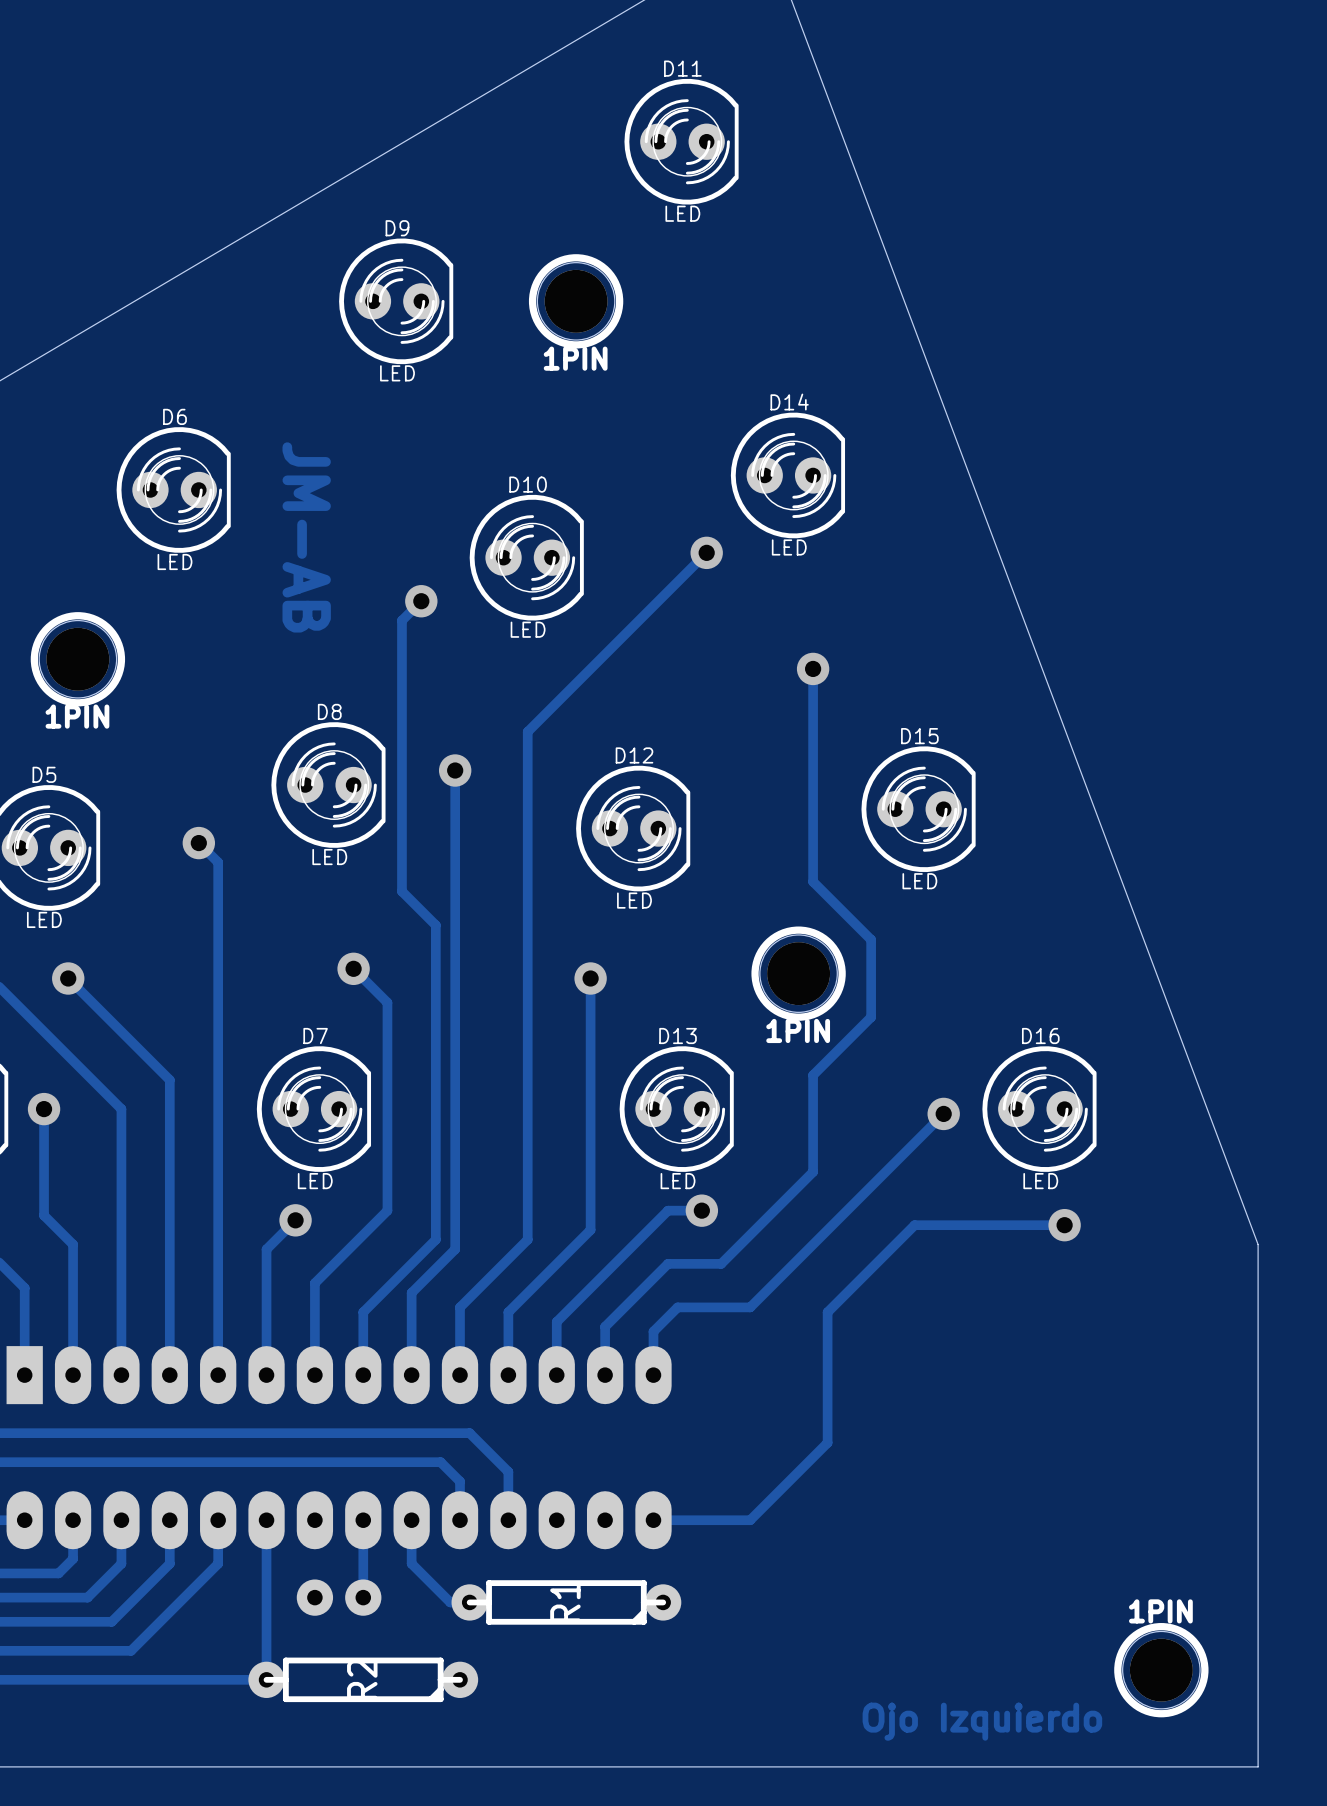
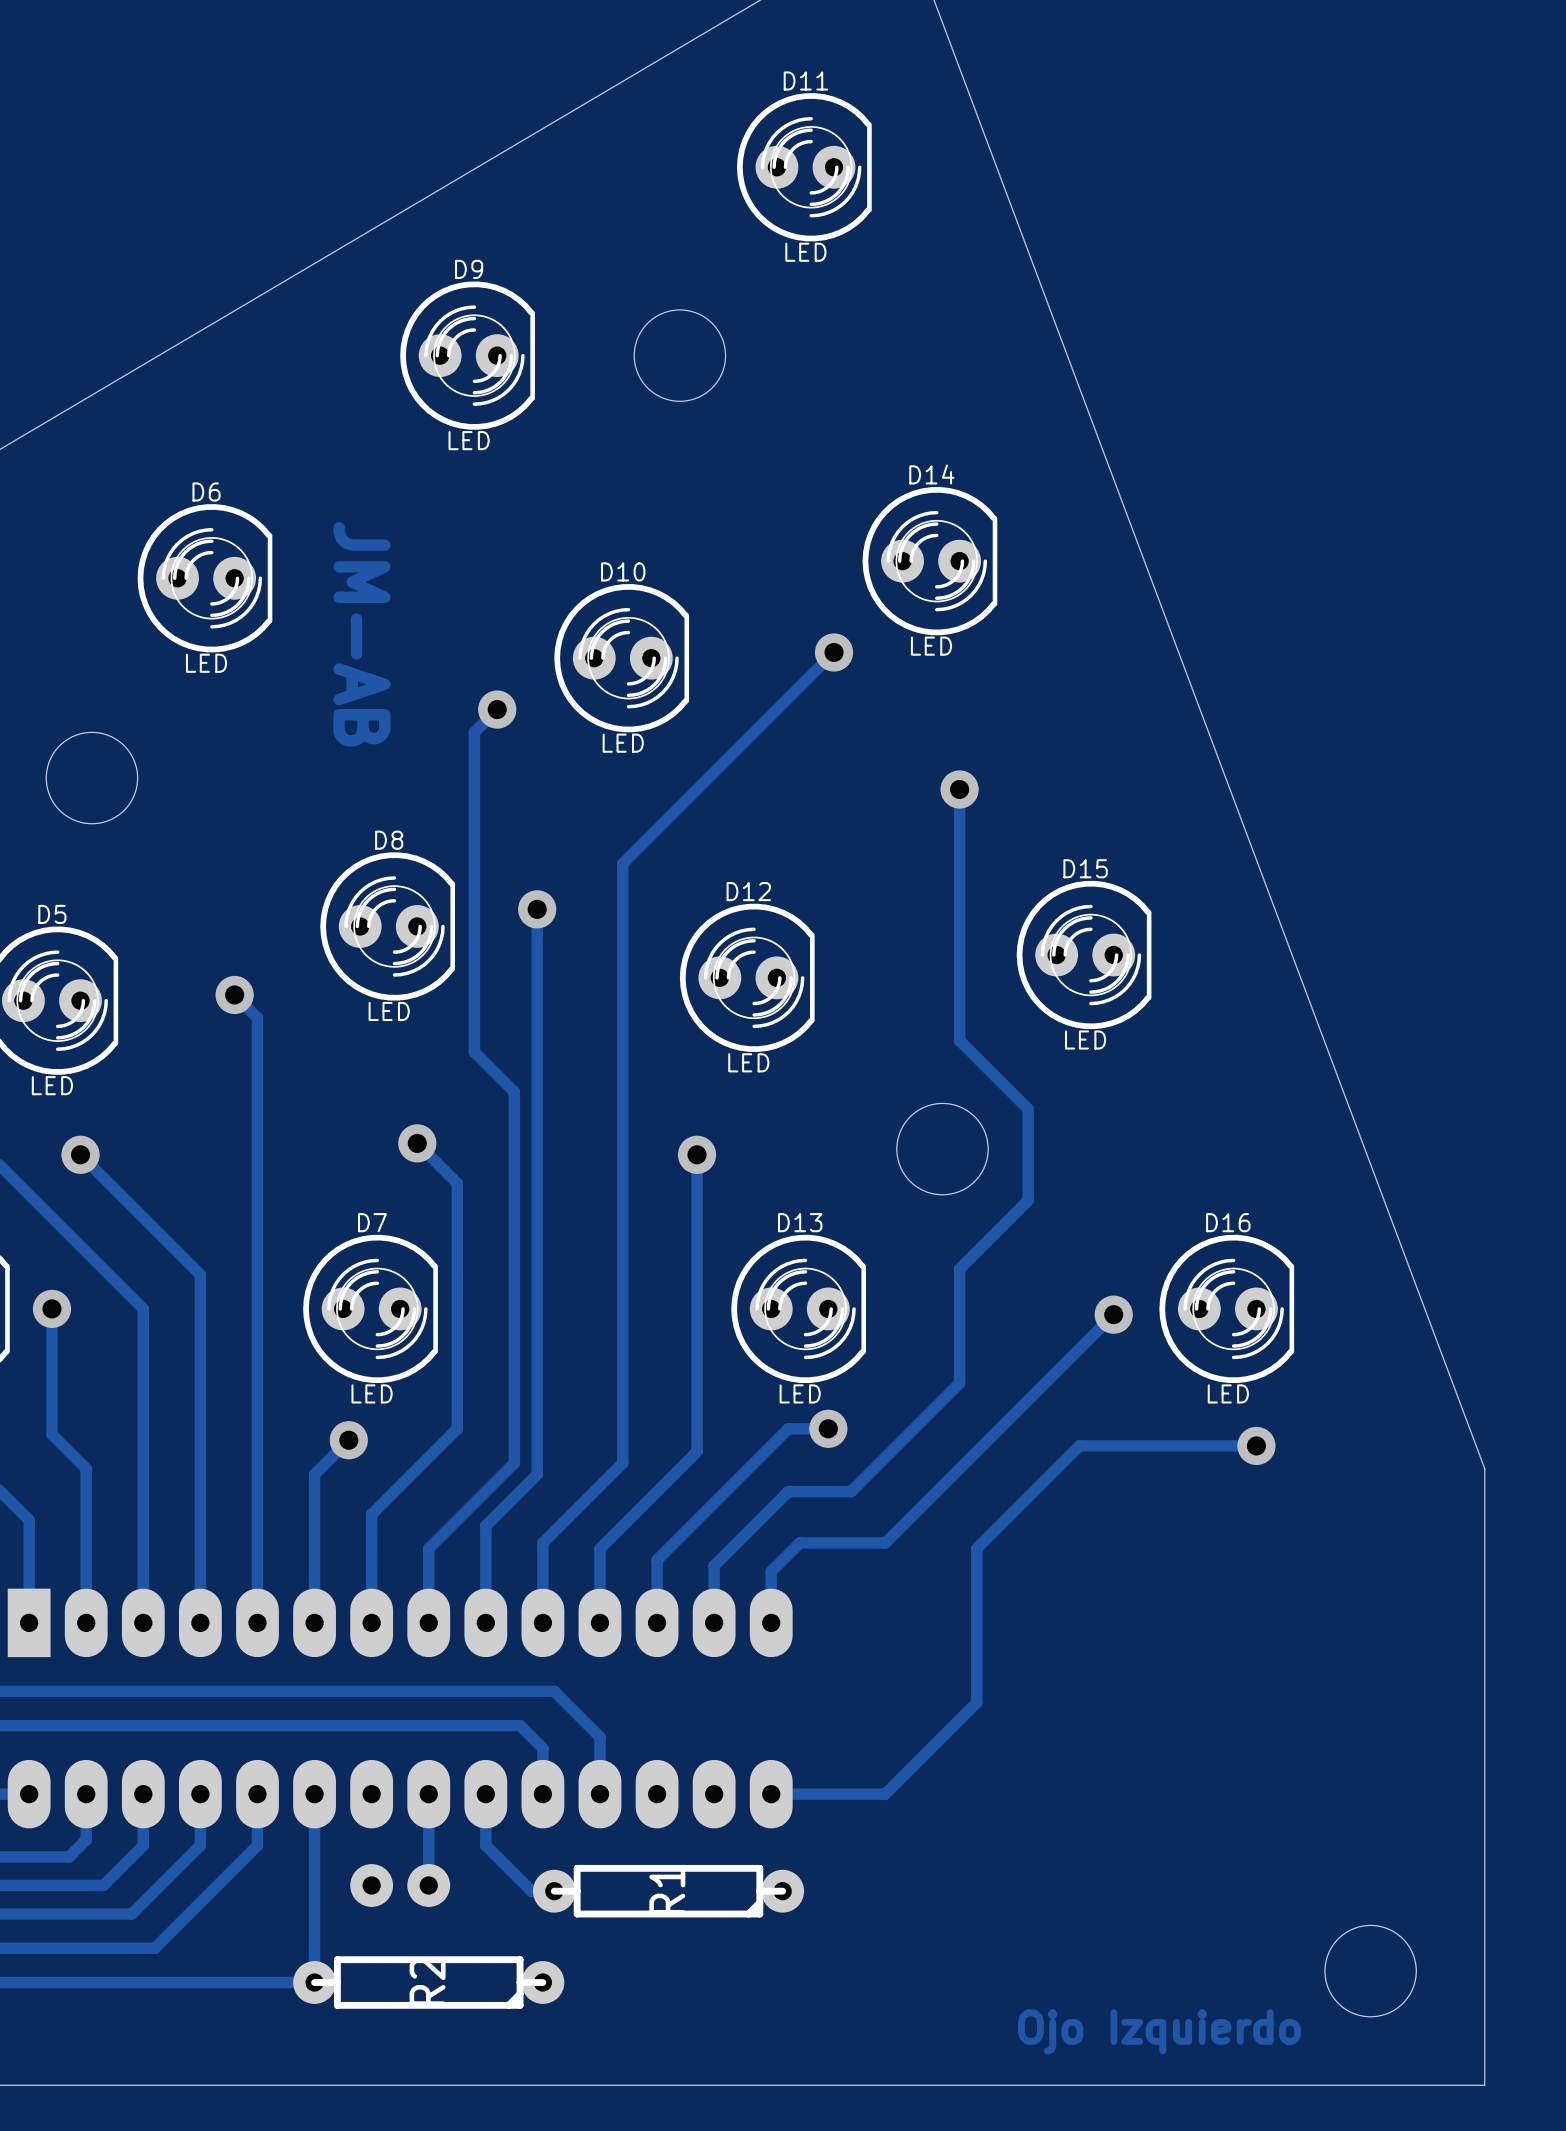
1PIN: (576, 301) -> none
1PIN: (77, 659) -> none
1PIN: (798, 973) -> none
1PIN: (1161, 1670) -> none

